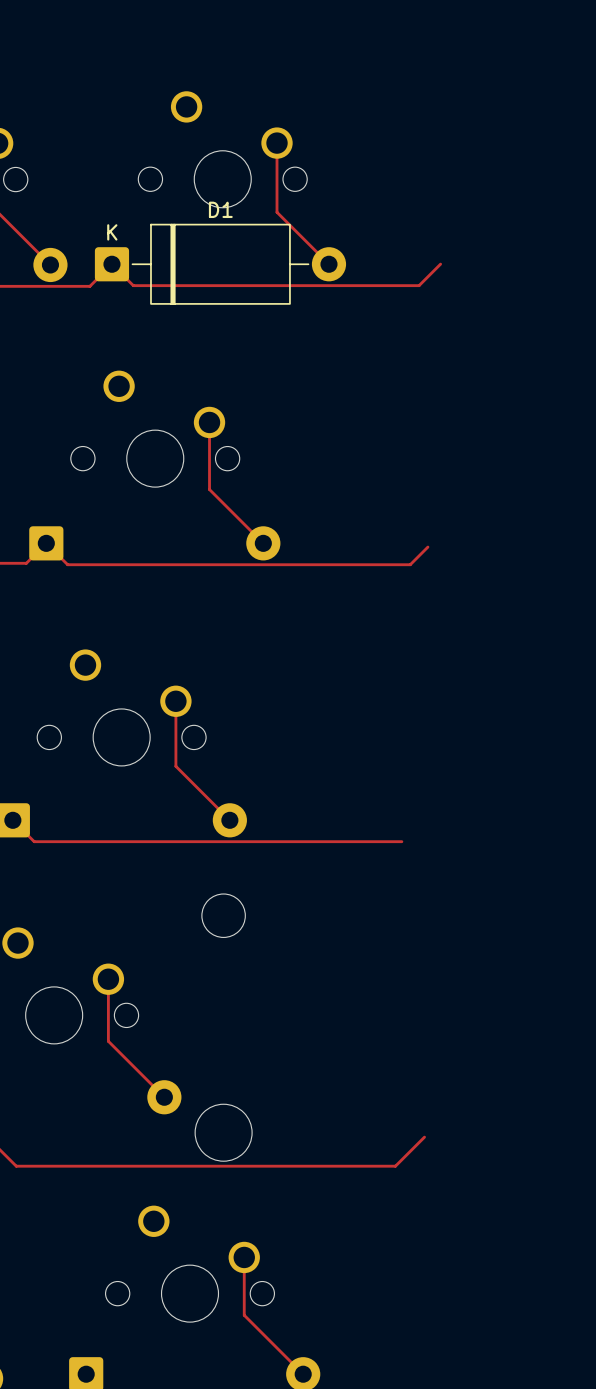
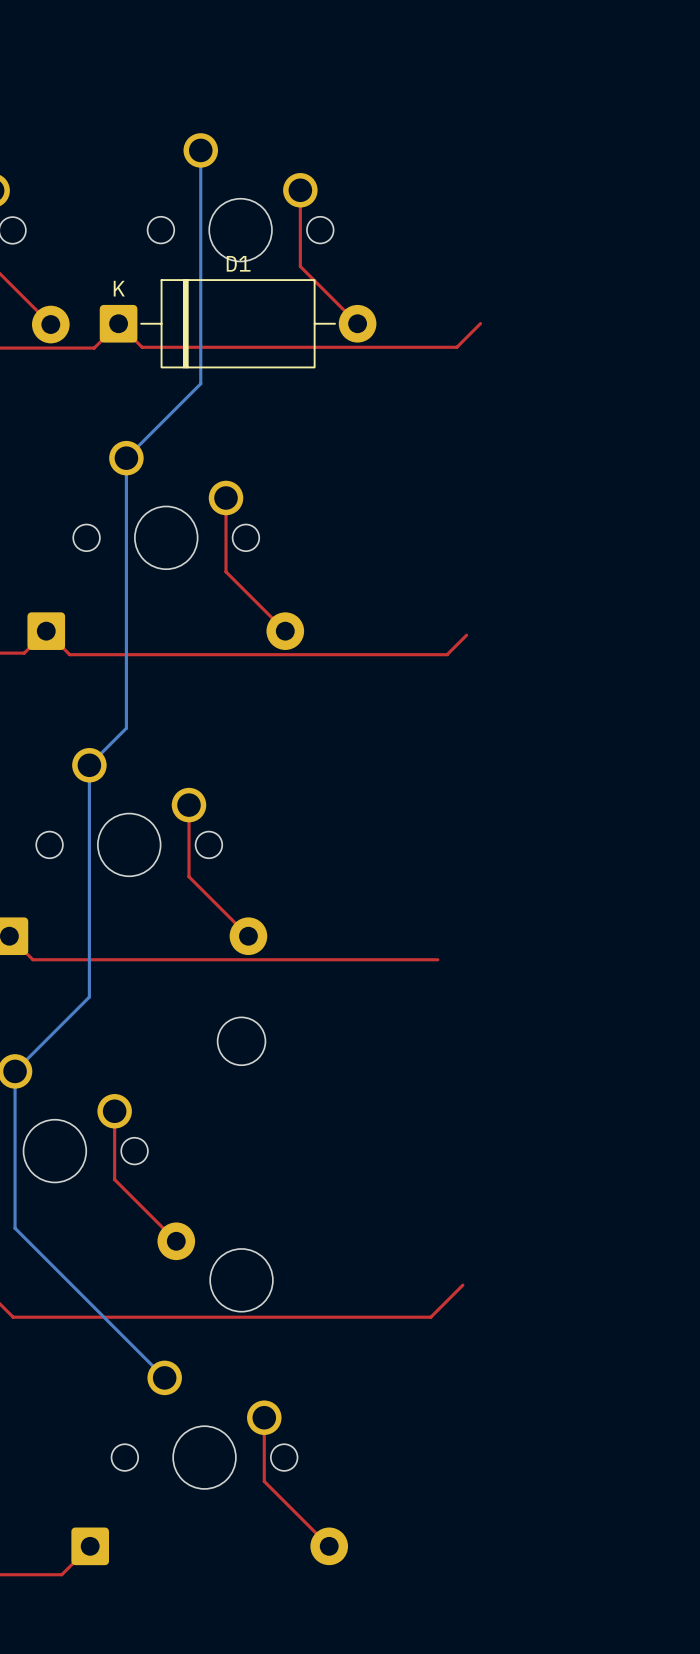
bottom track: none -> (200, 150) (200, 383) (126, 458) (126, 728) (89, 765) (89, 997) (15, 1071) (15, 1228) (164, 1377)

